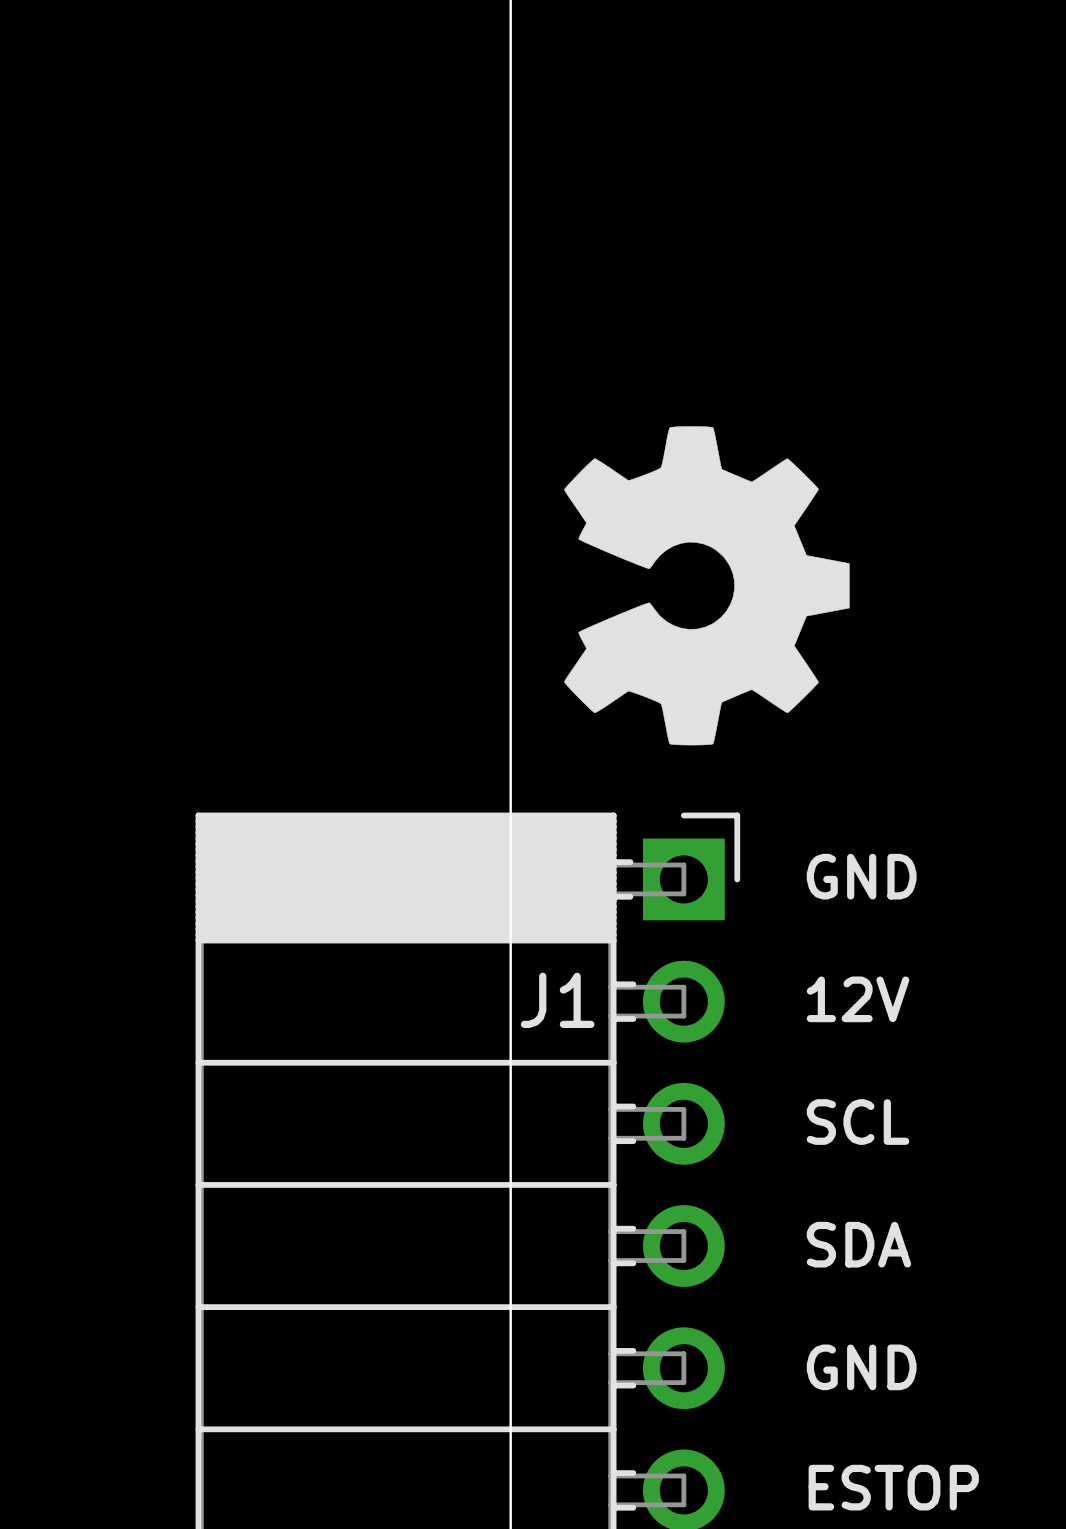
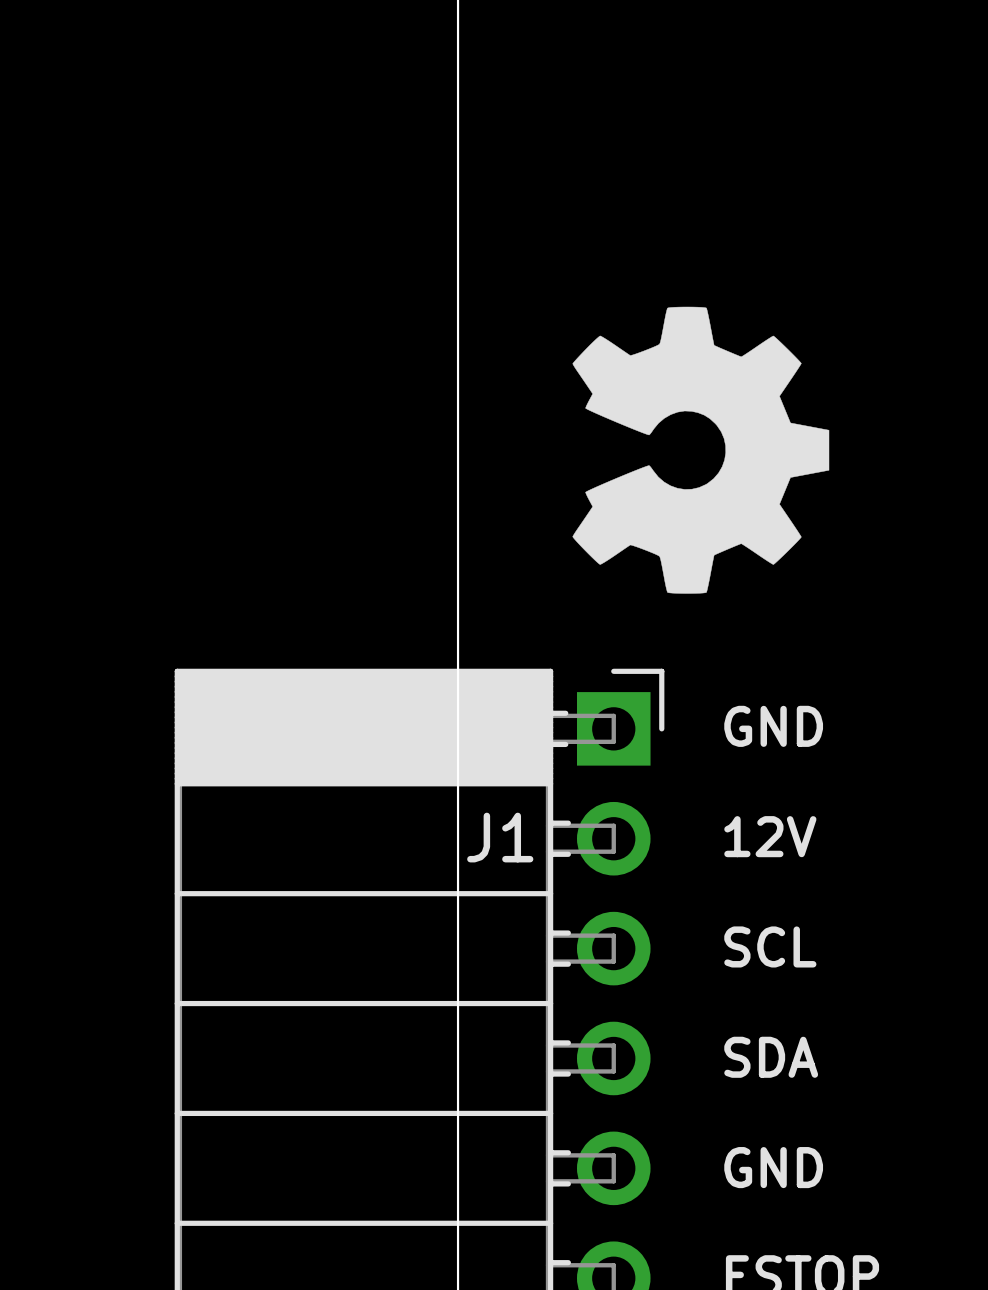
drawing position: (706, 585) -> (700, 450)

